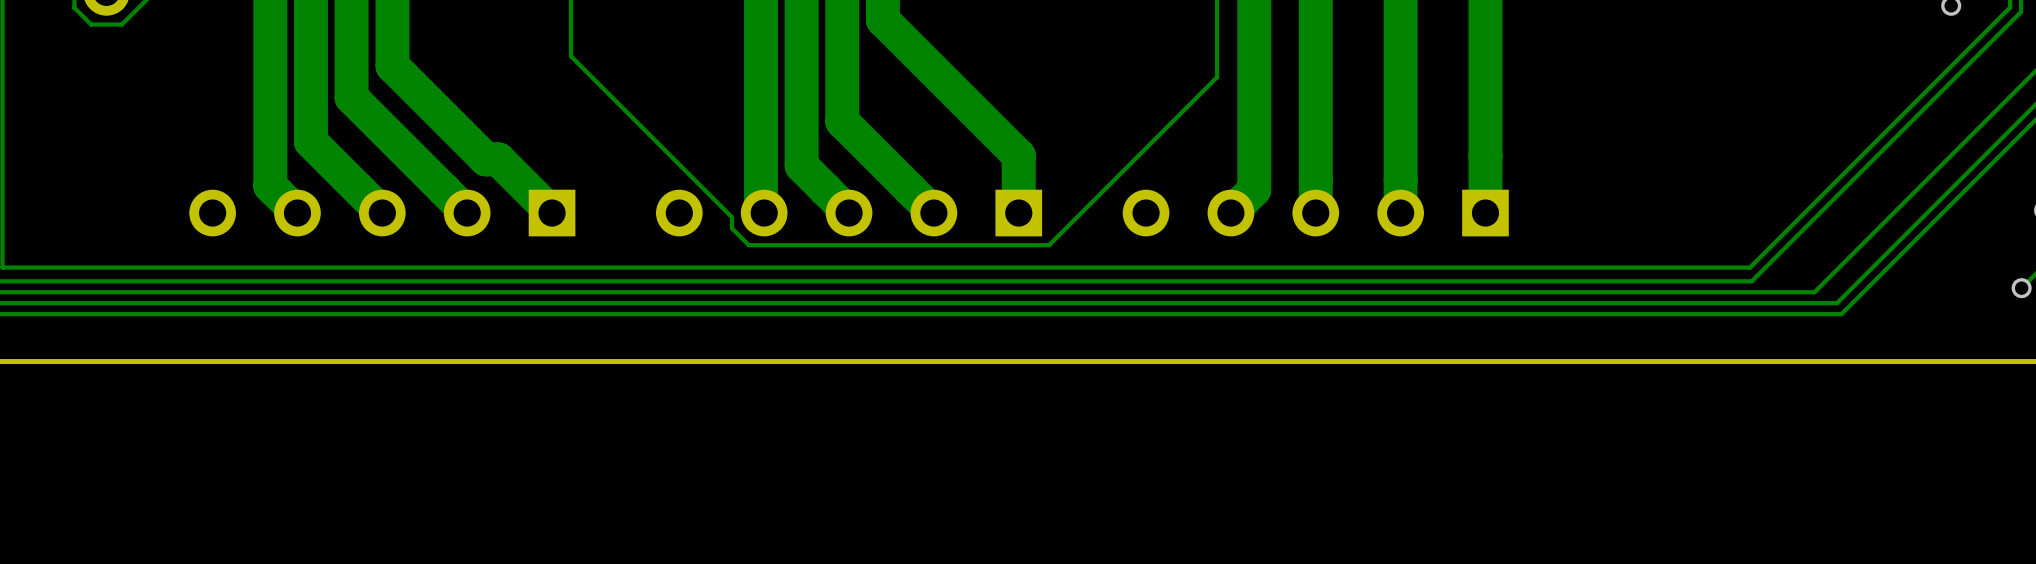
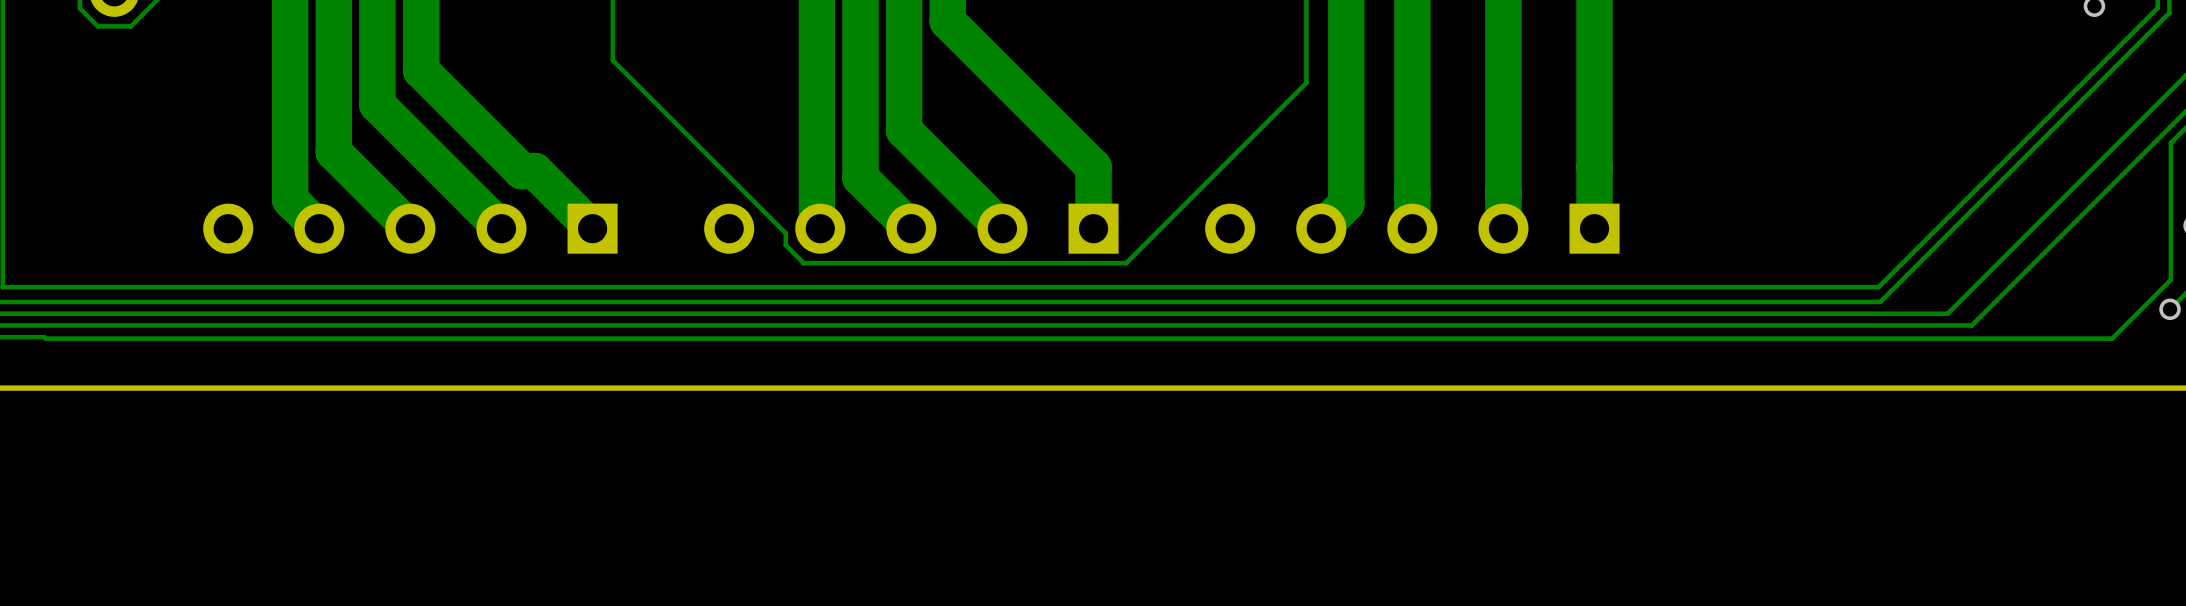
track: (2022, 133) (1841, 314) (41, 314) -> (2170, 142) (2170, 279) (2112, 338) (44, 337)

